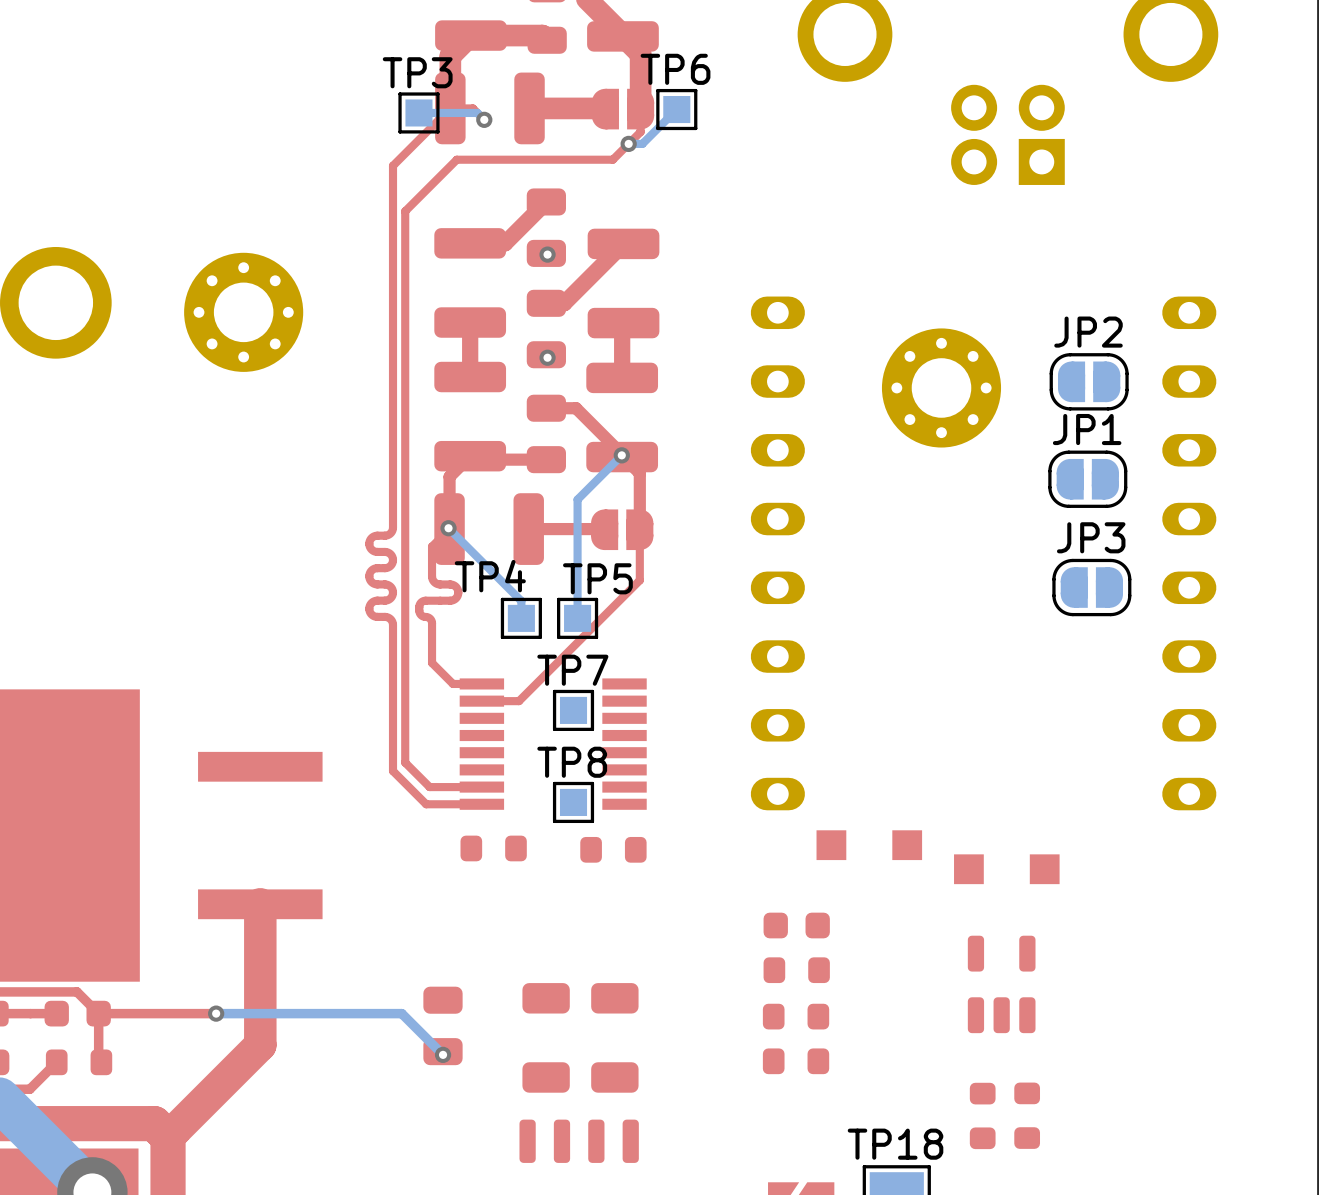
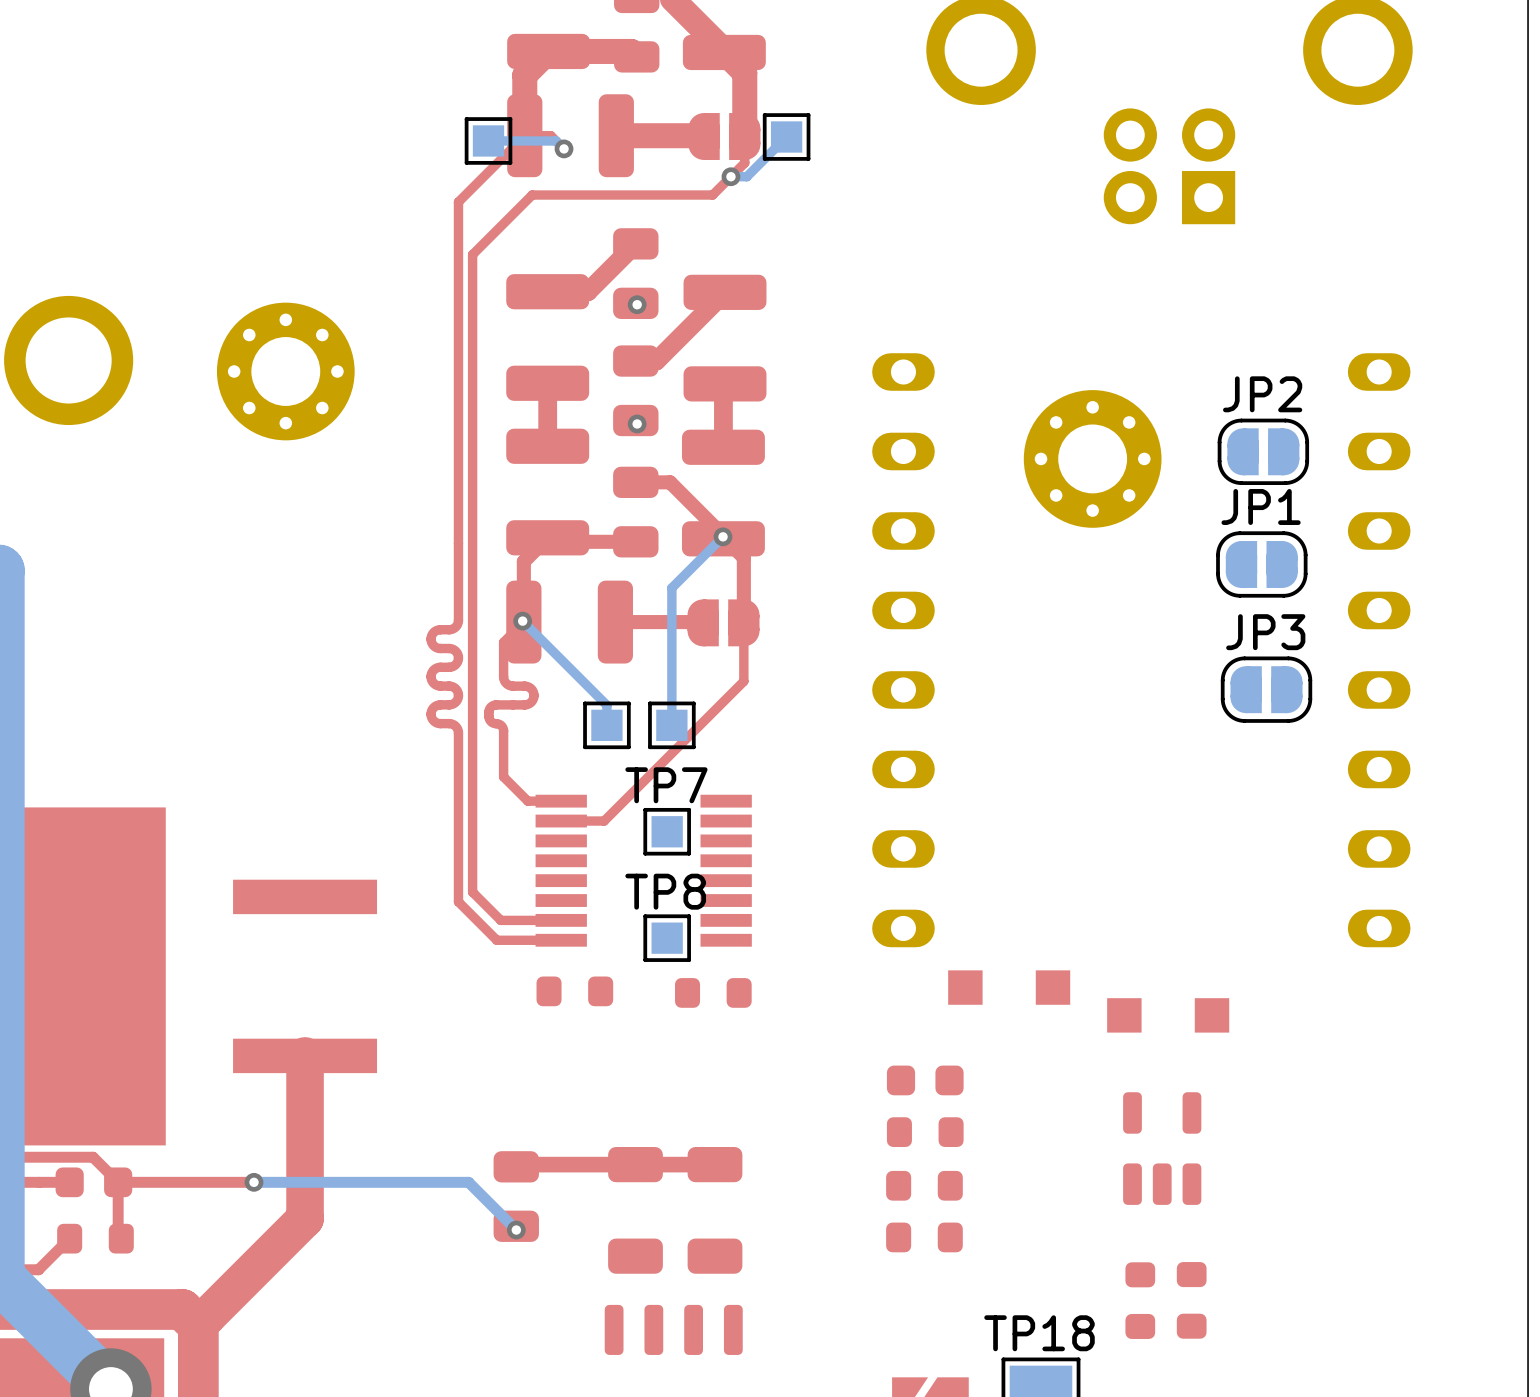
TP6 name: TP6 (675, 69) -> none
TP3 name: TP3 (417, 72) -> none
TP4 name: TP4 (490, 576) -> none
TP5 name: TP5 (597, 578) -> none
top track: none -> (715, 1164) (518, 1164) (516, 1166)

